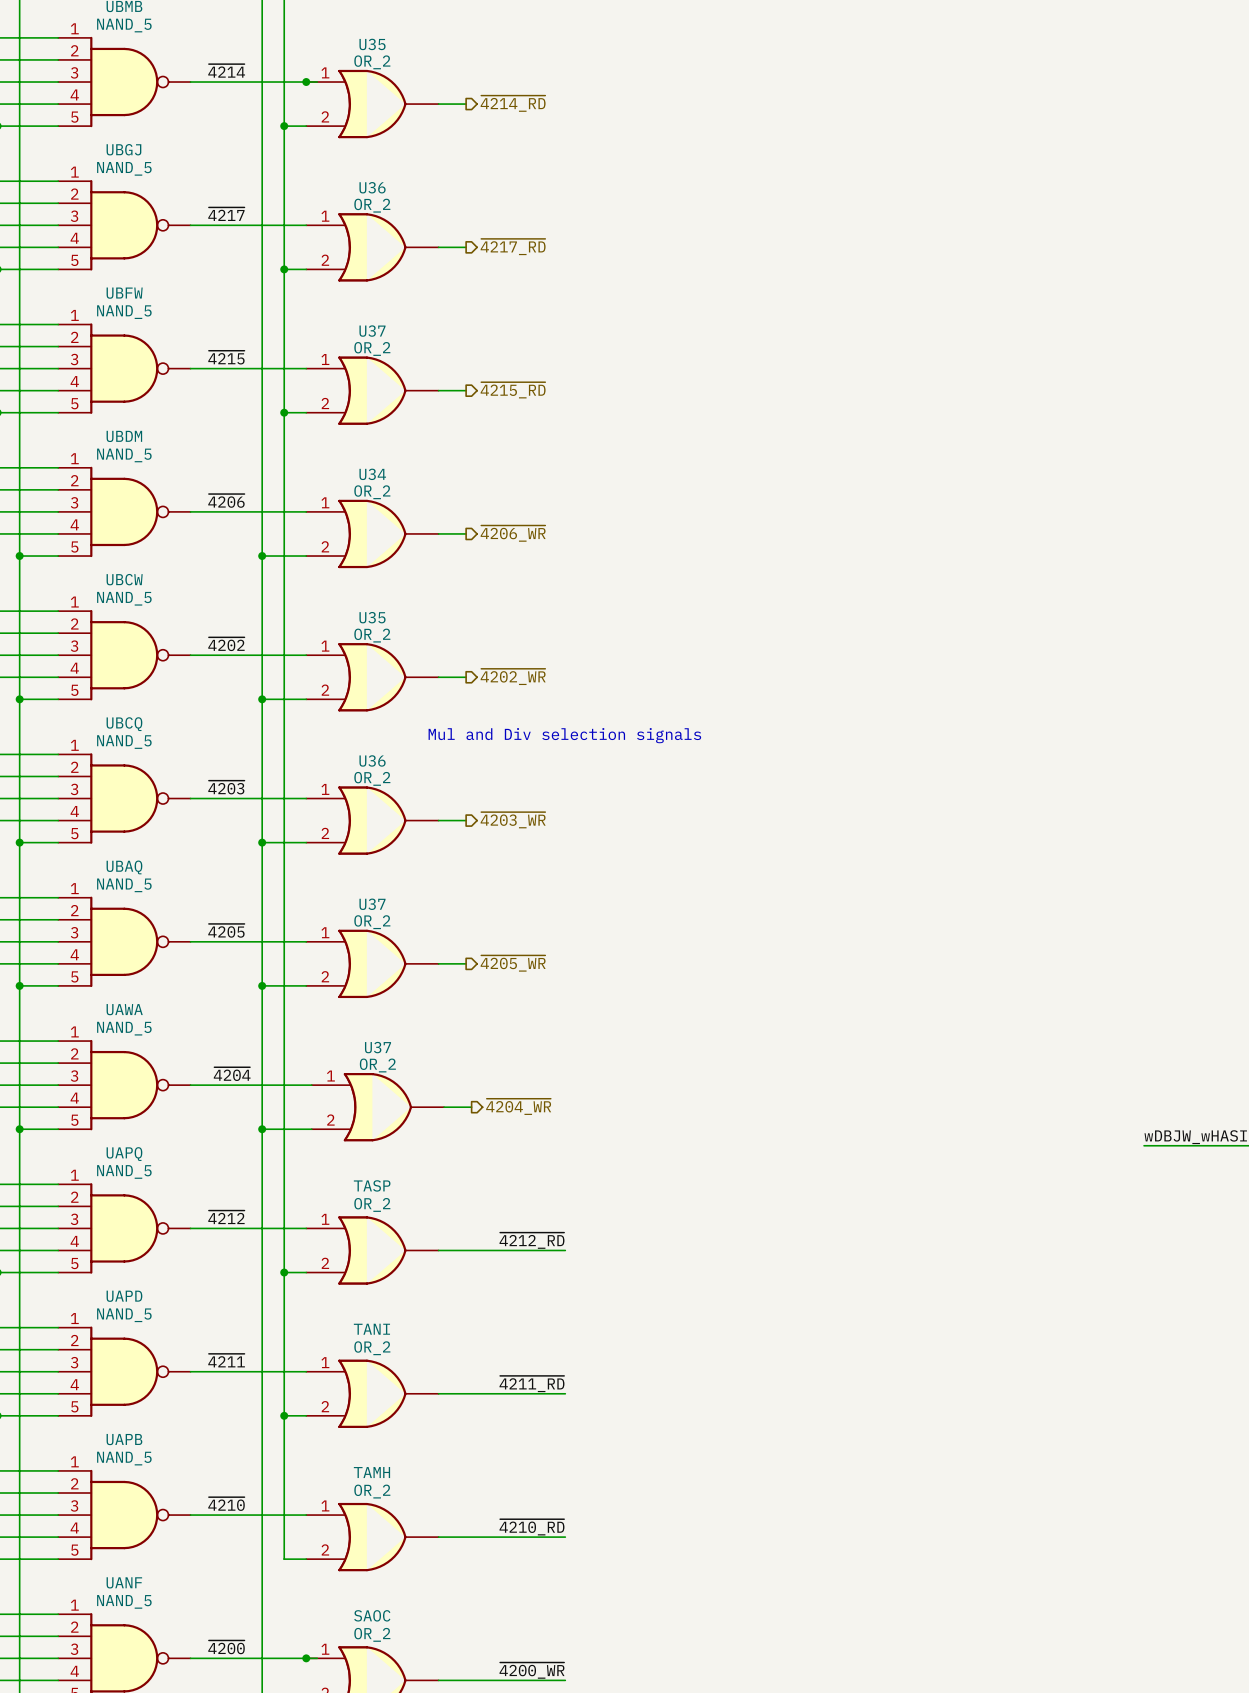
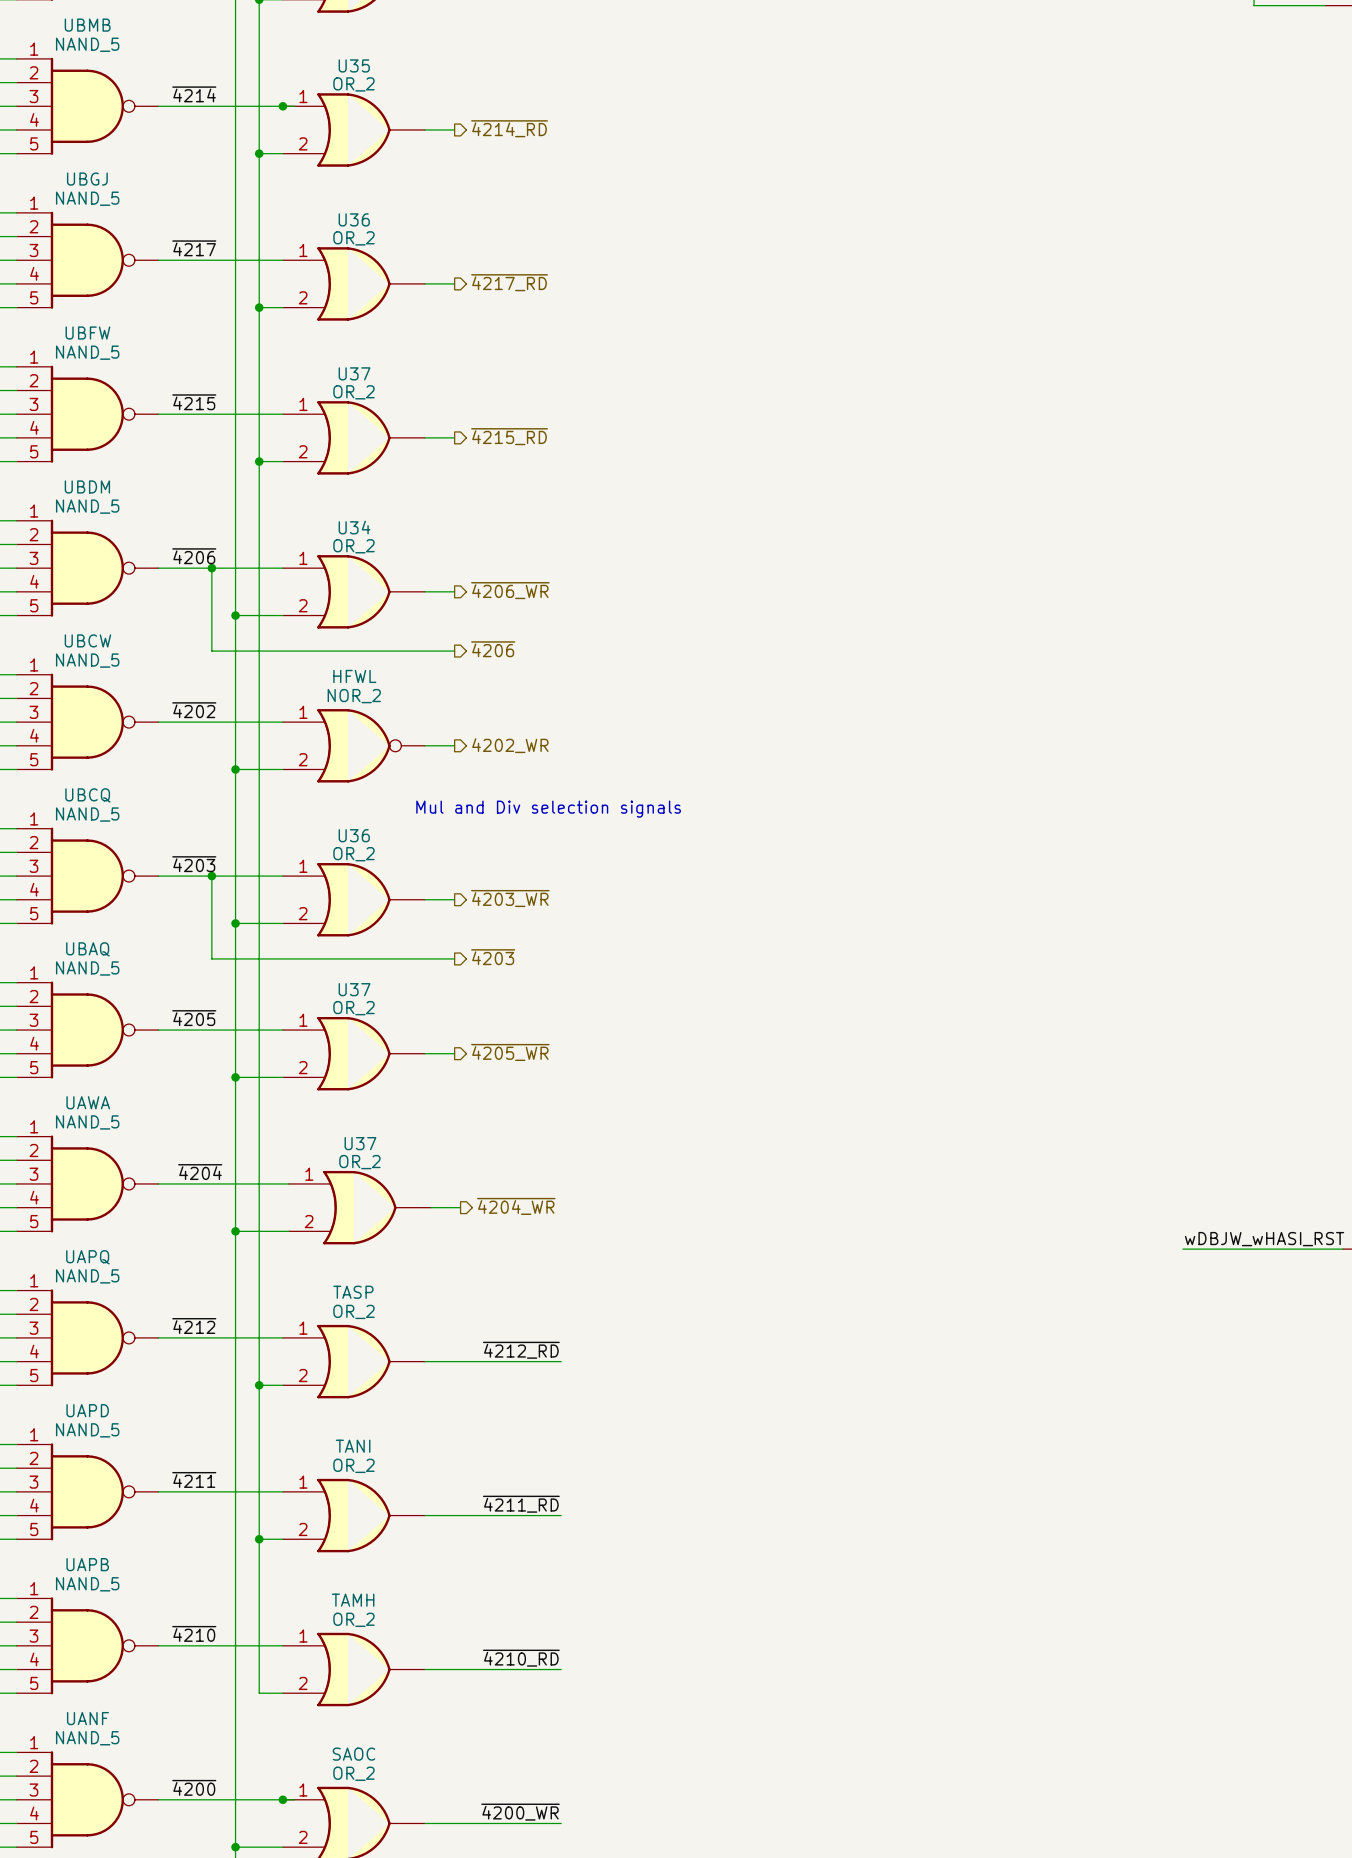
wire: none -> (211, 568) (211, 651) (454, 651)
junction: none -> (211, 568)
hierarchical label: none -> ~{4206} (493, 649)
hierarchical label: ~{4202_WR} (513, 676) -> 4202_WR (510, 745)
U35: OR_2 (372, 677) -> none
HFWL: none -> NOR_2 (353, 745)
wire: none -> (211, 876) (211, 958) (454, 958)
junction: none -> (211, 876)
hierarchical label: none -> ~{4203} (493, 957)

